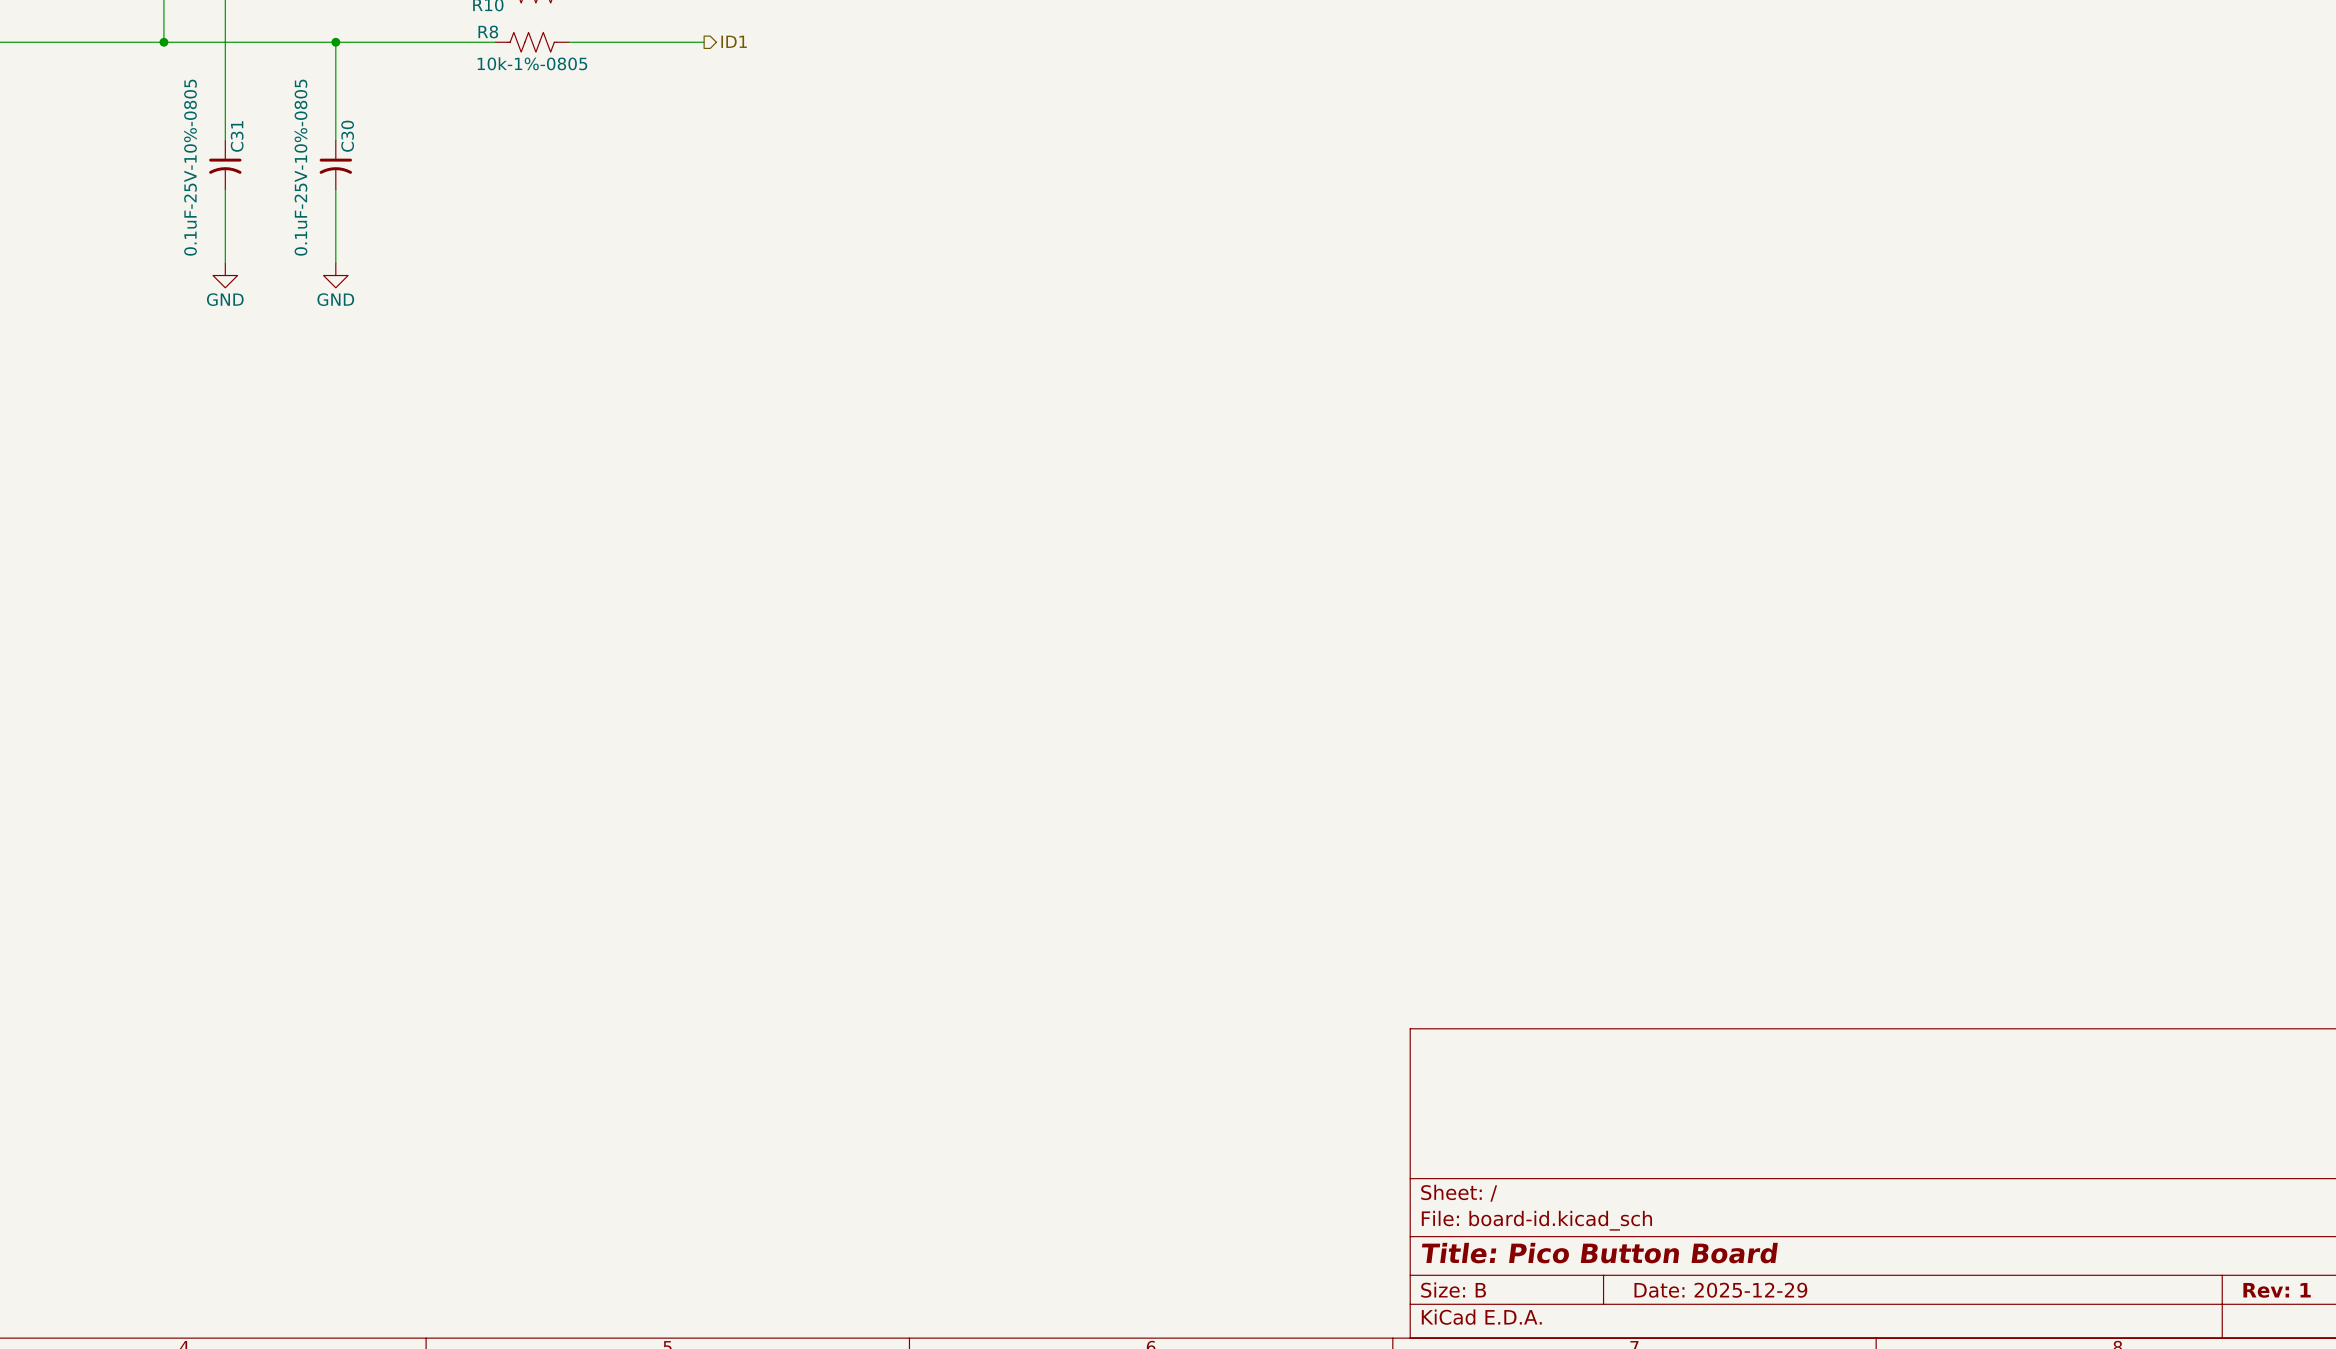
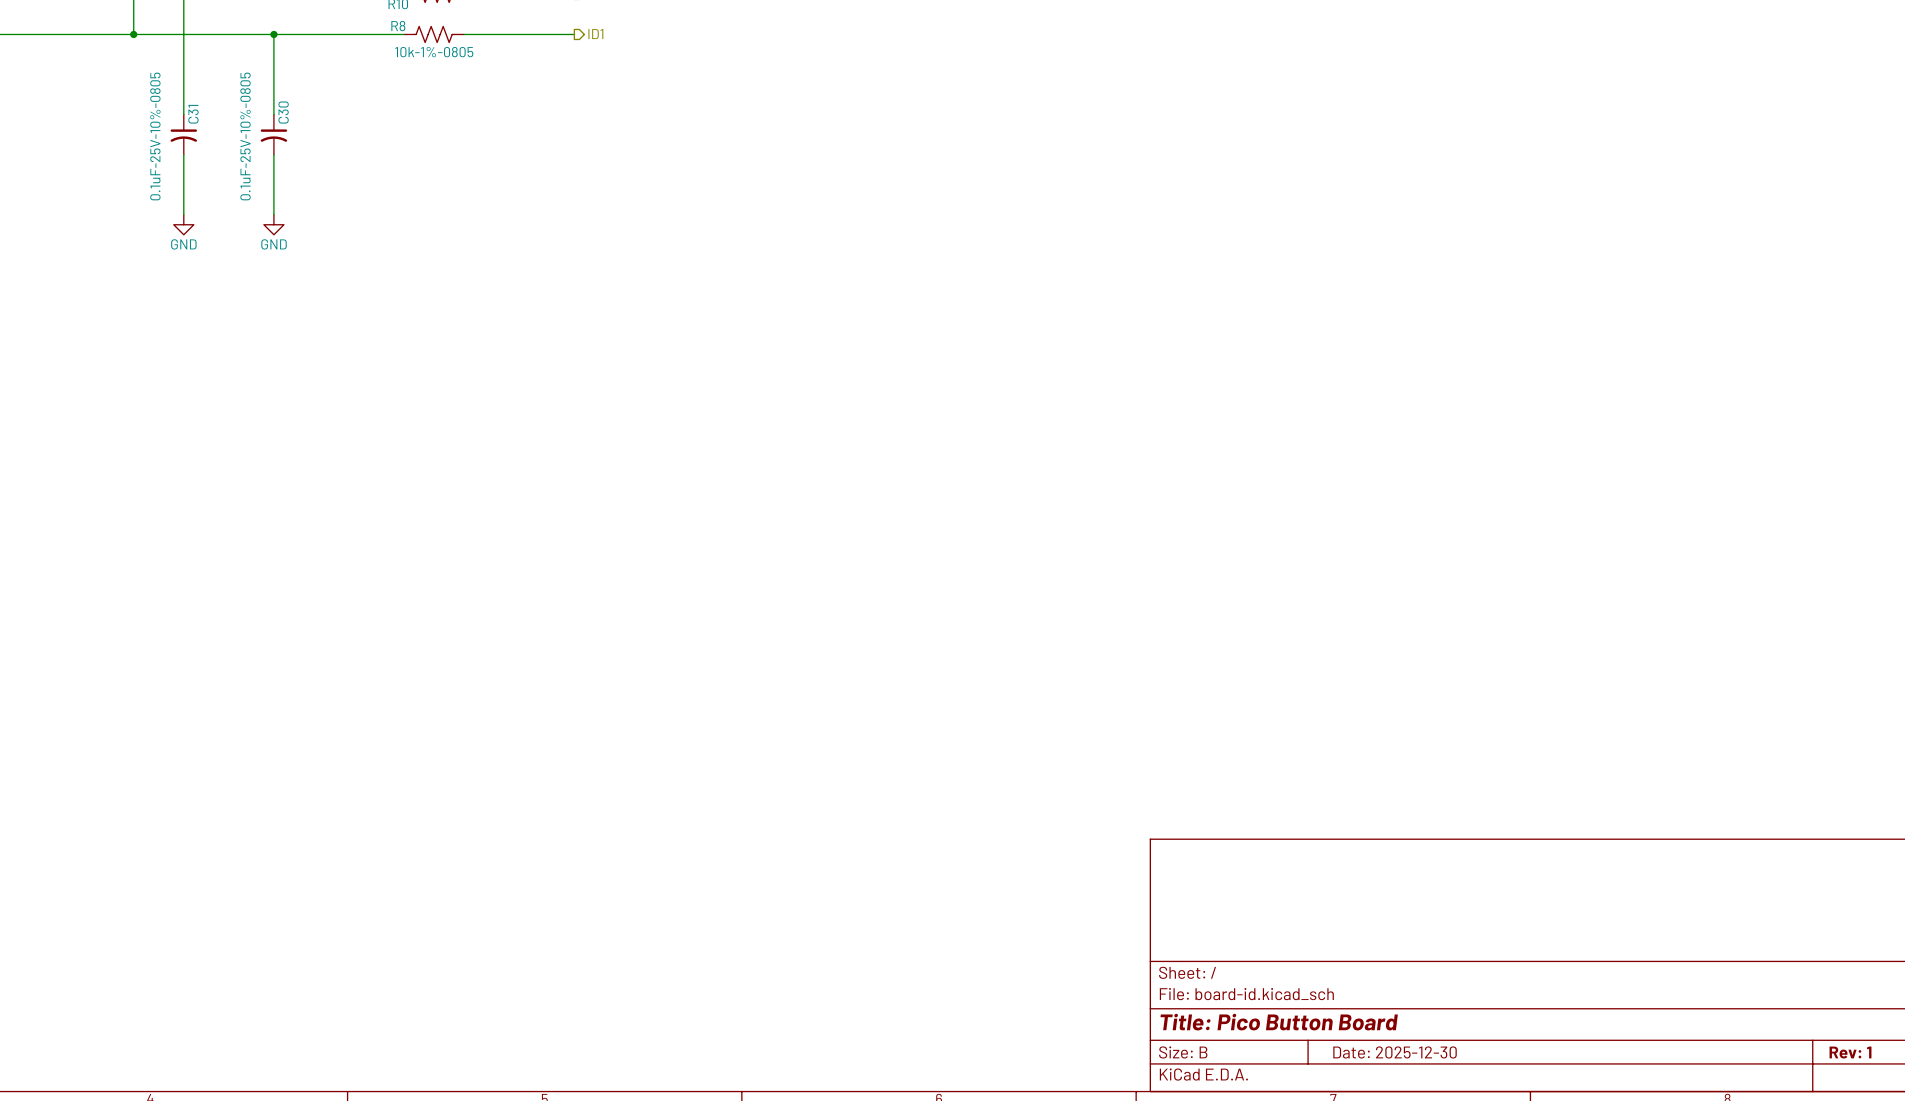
title block: Date: 2025-12-29 (1720, 1290) -> Date: 2025-12-30 (1395, 1052)

